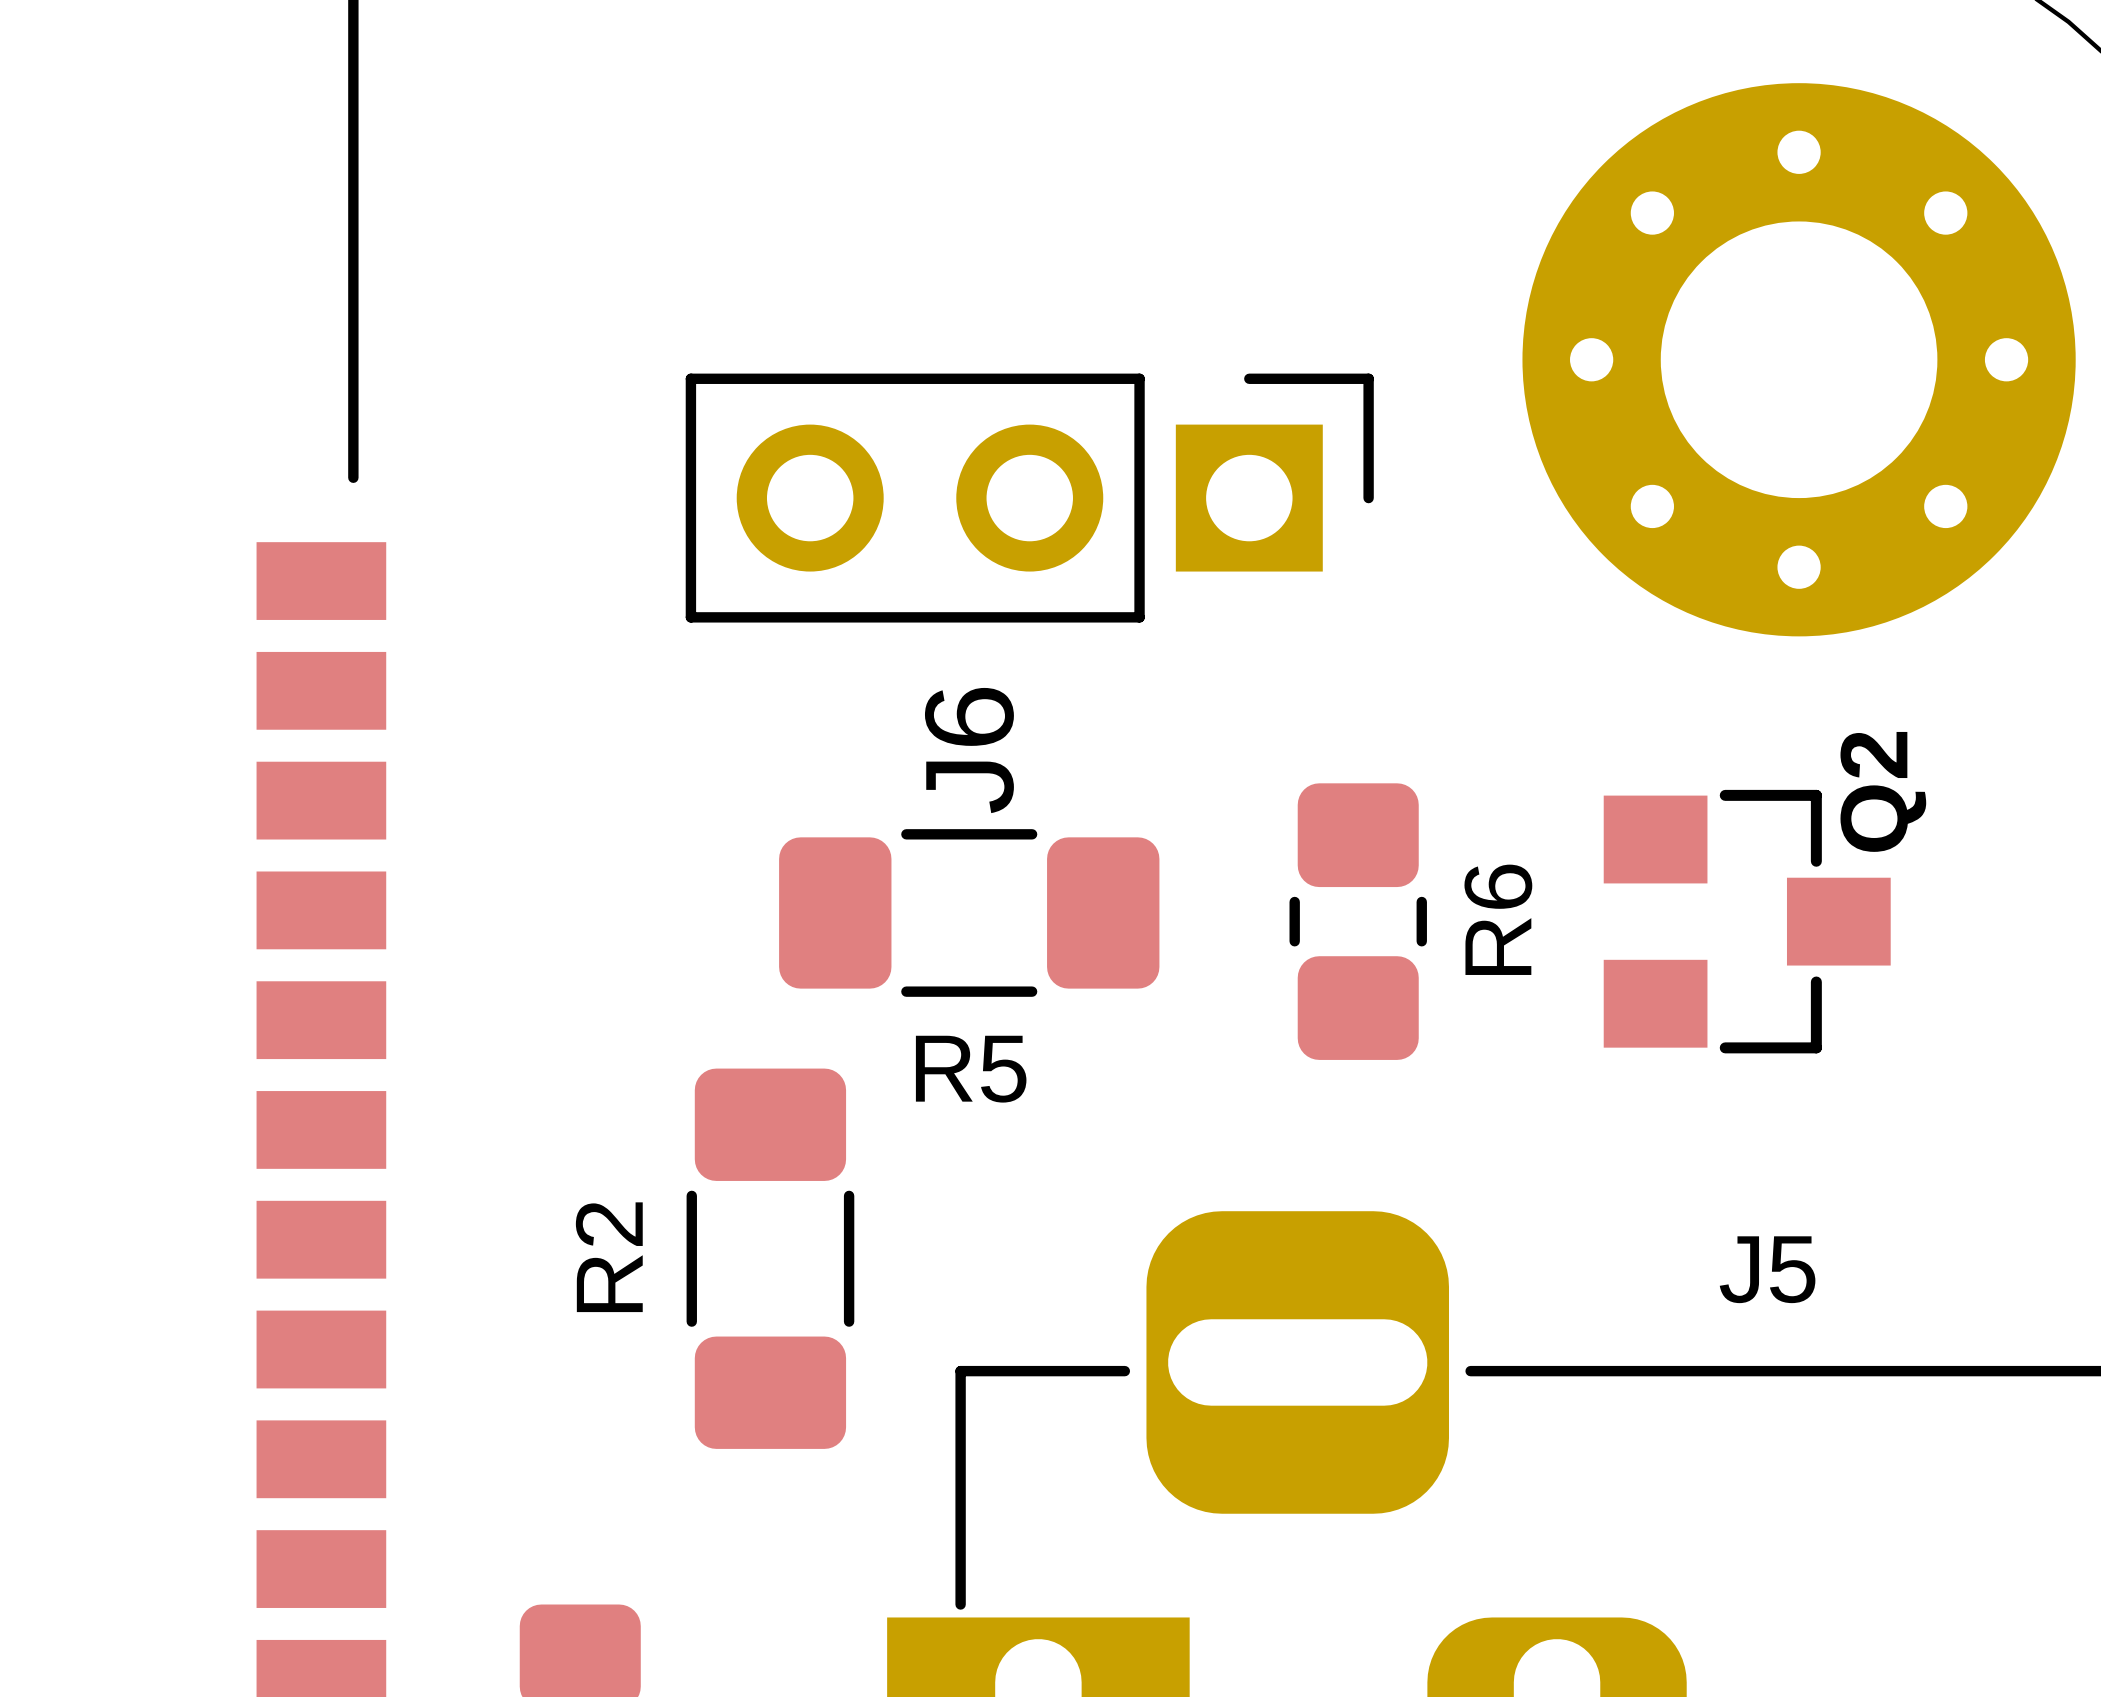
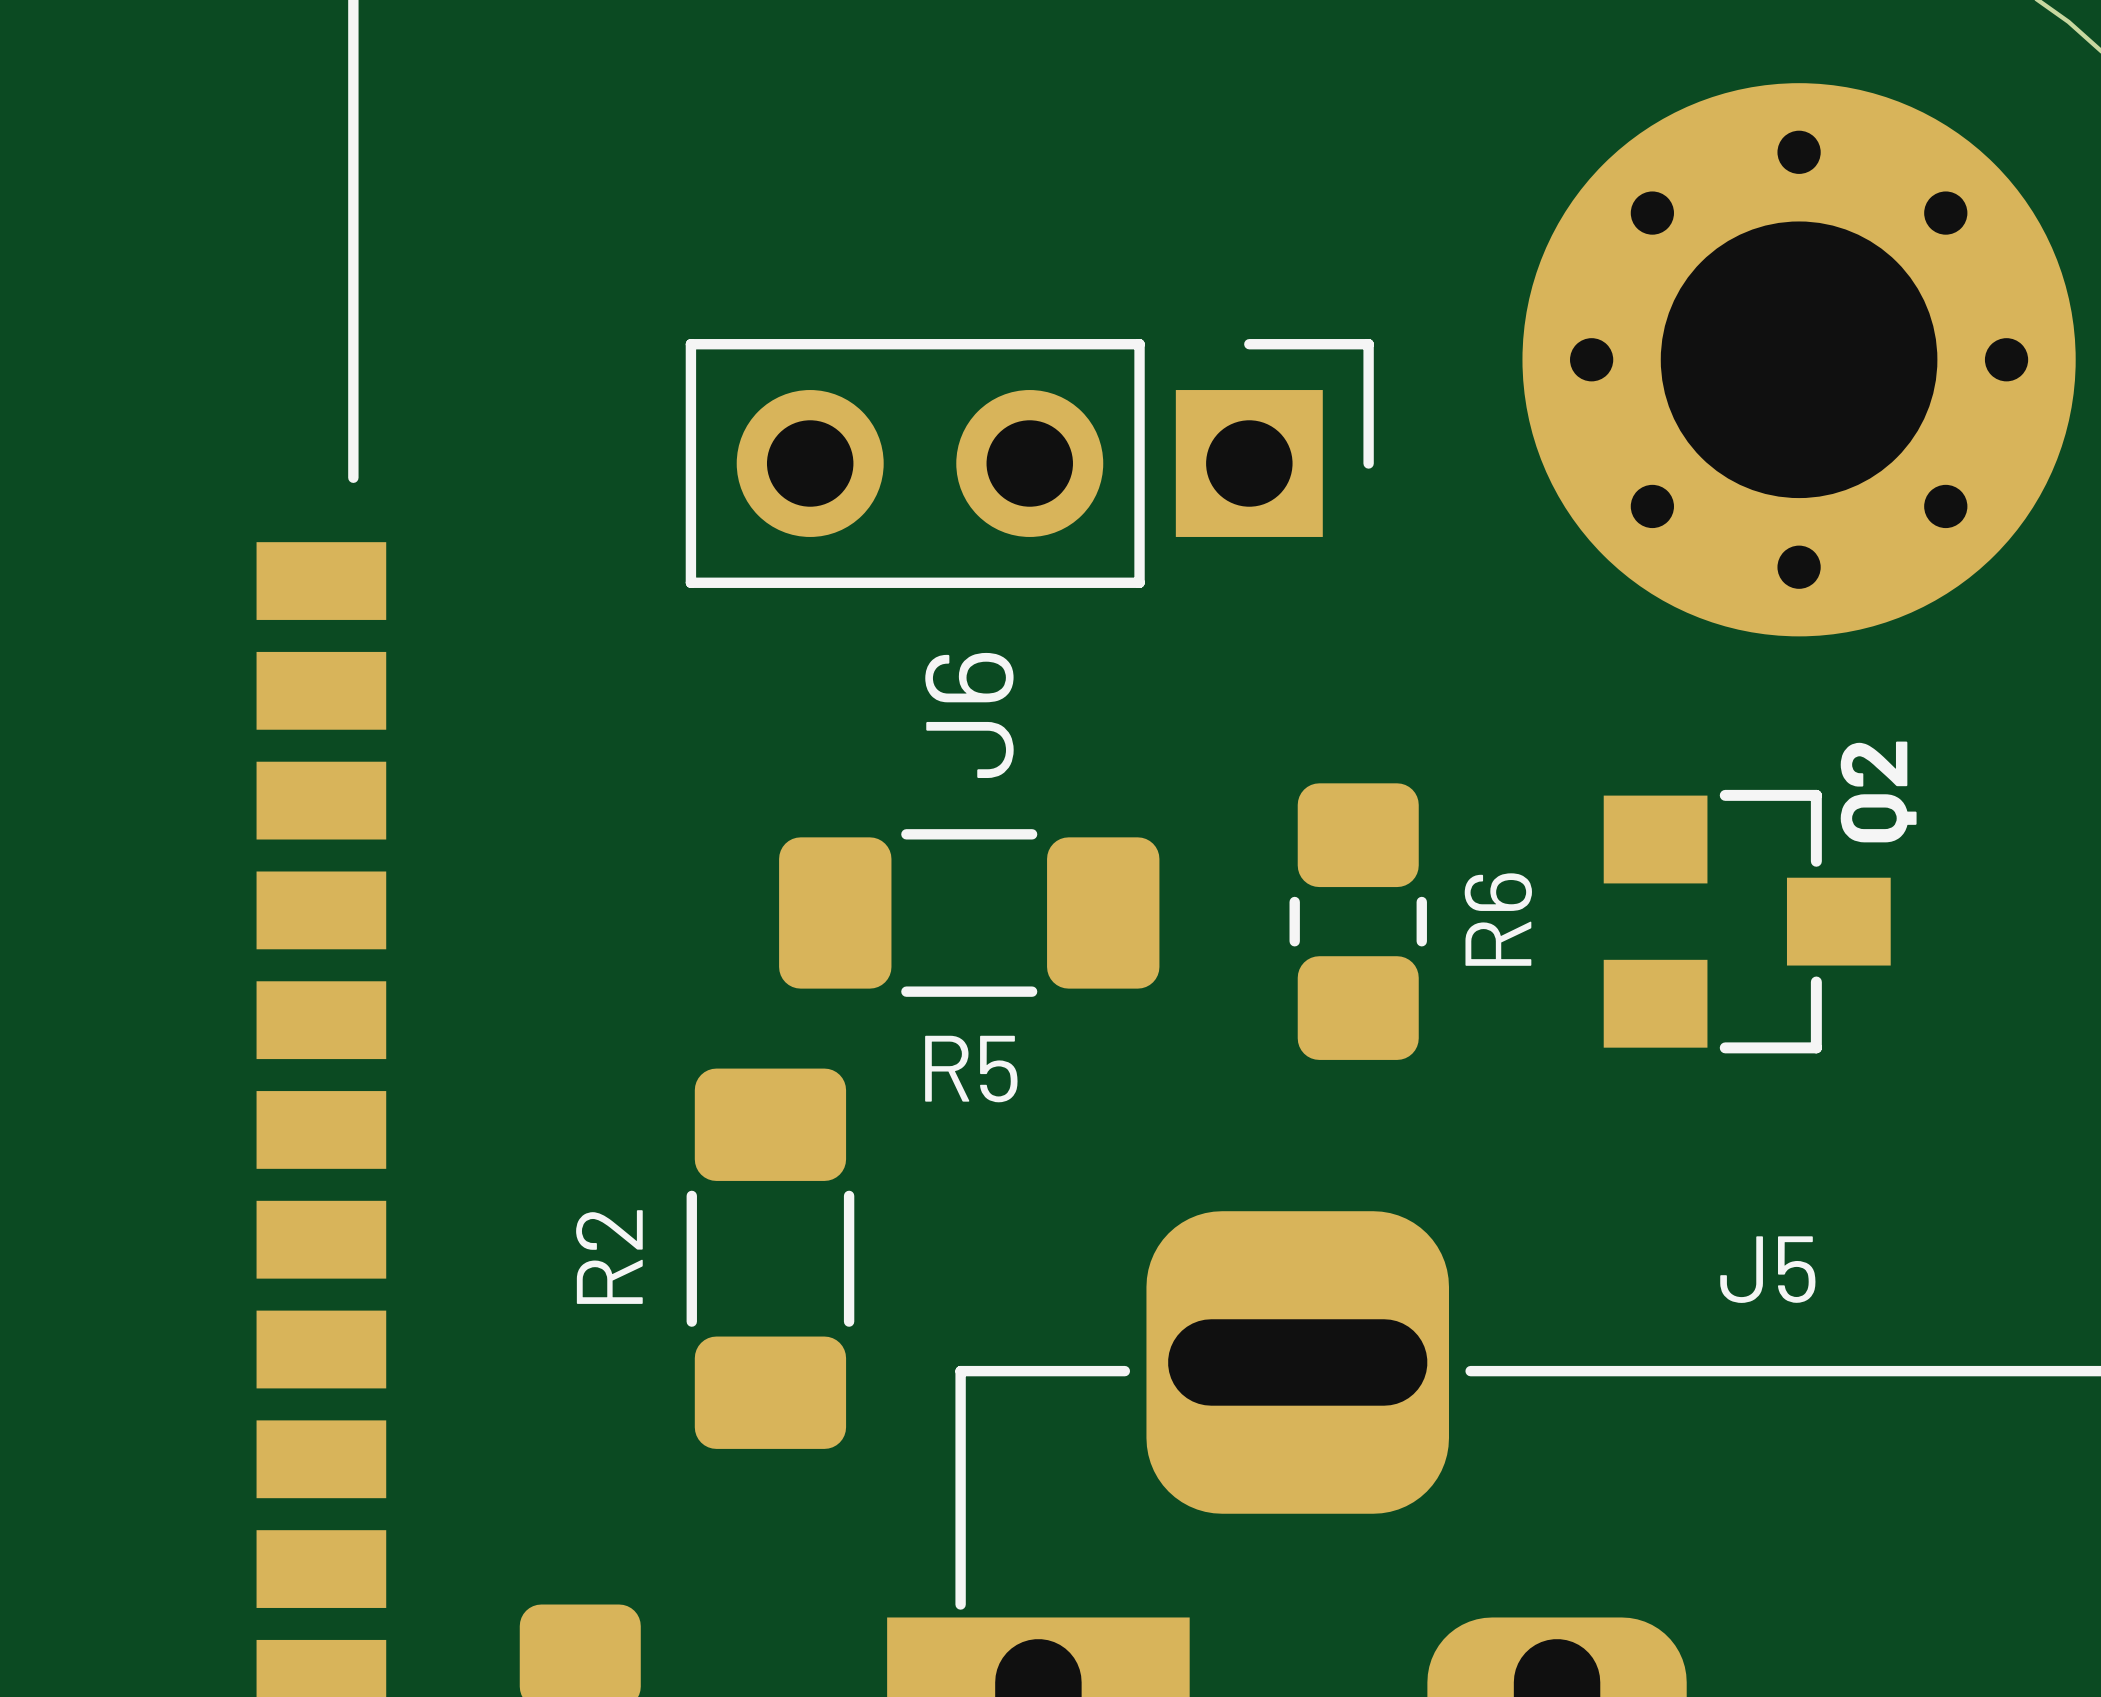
J6 position: (1029, 498) -> (1029, 463)

